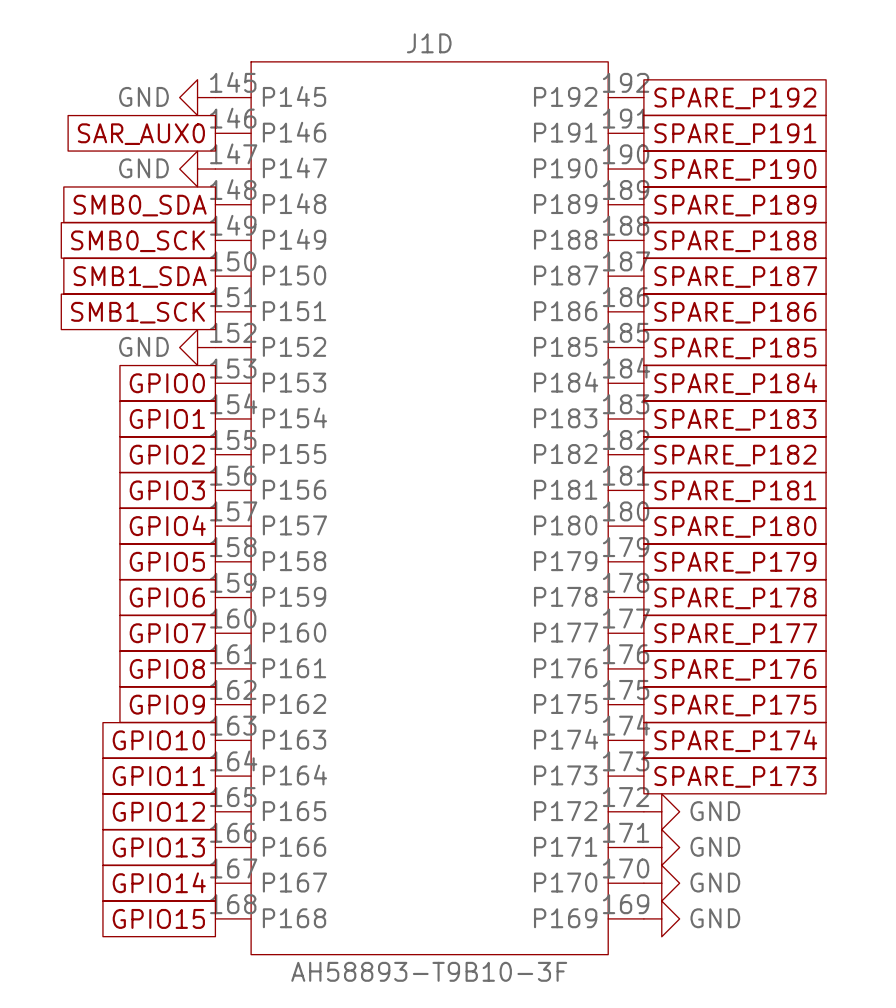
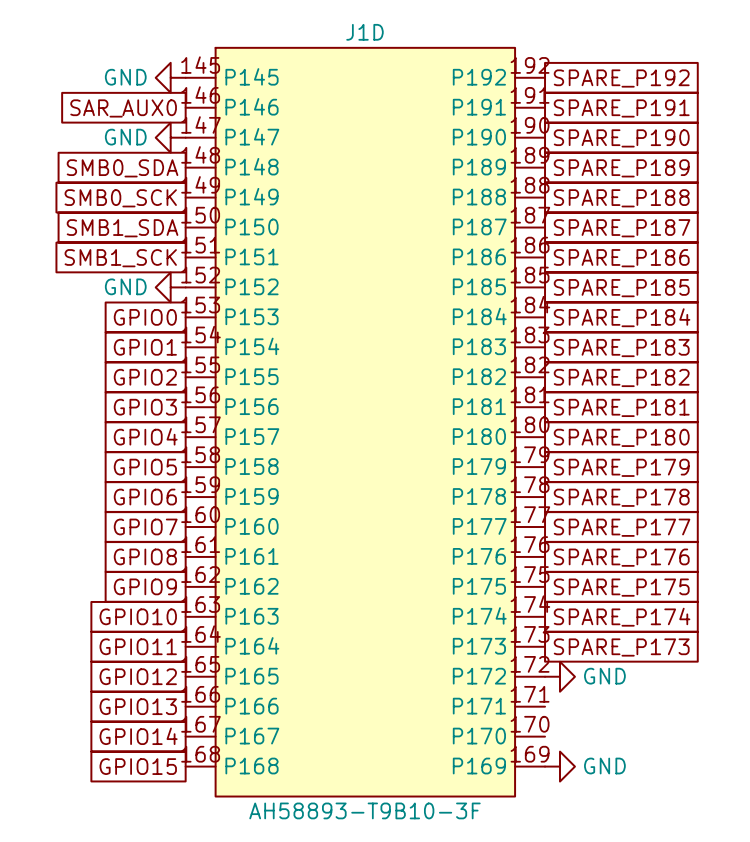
power symbol: GND (661, 847) -> none
power symbol: GND (661, 883) -> none

